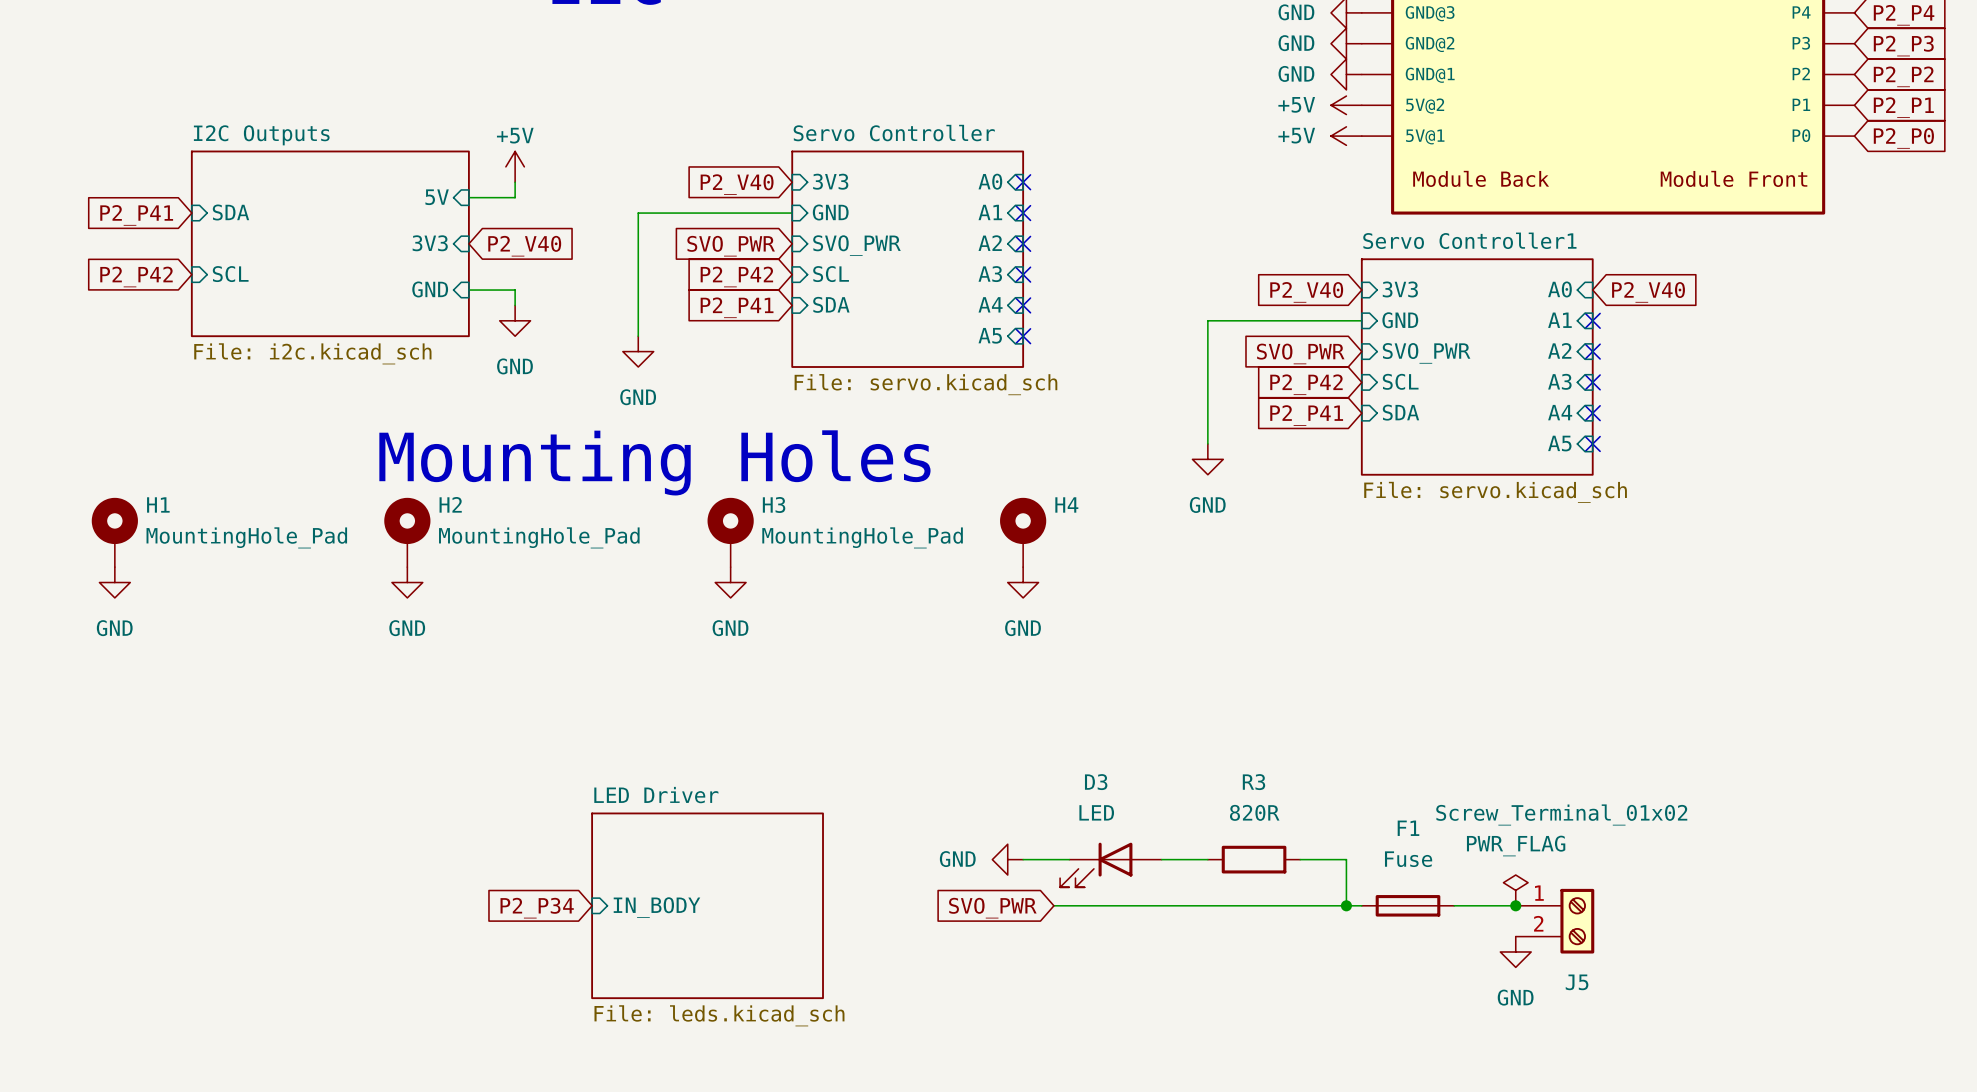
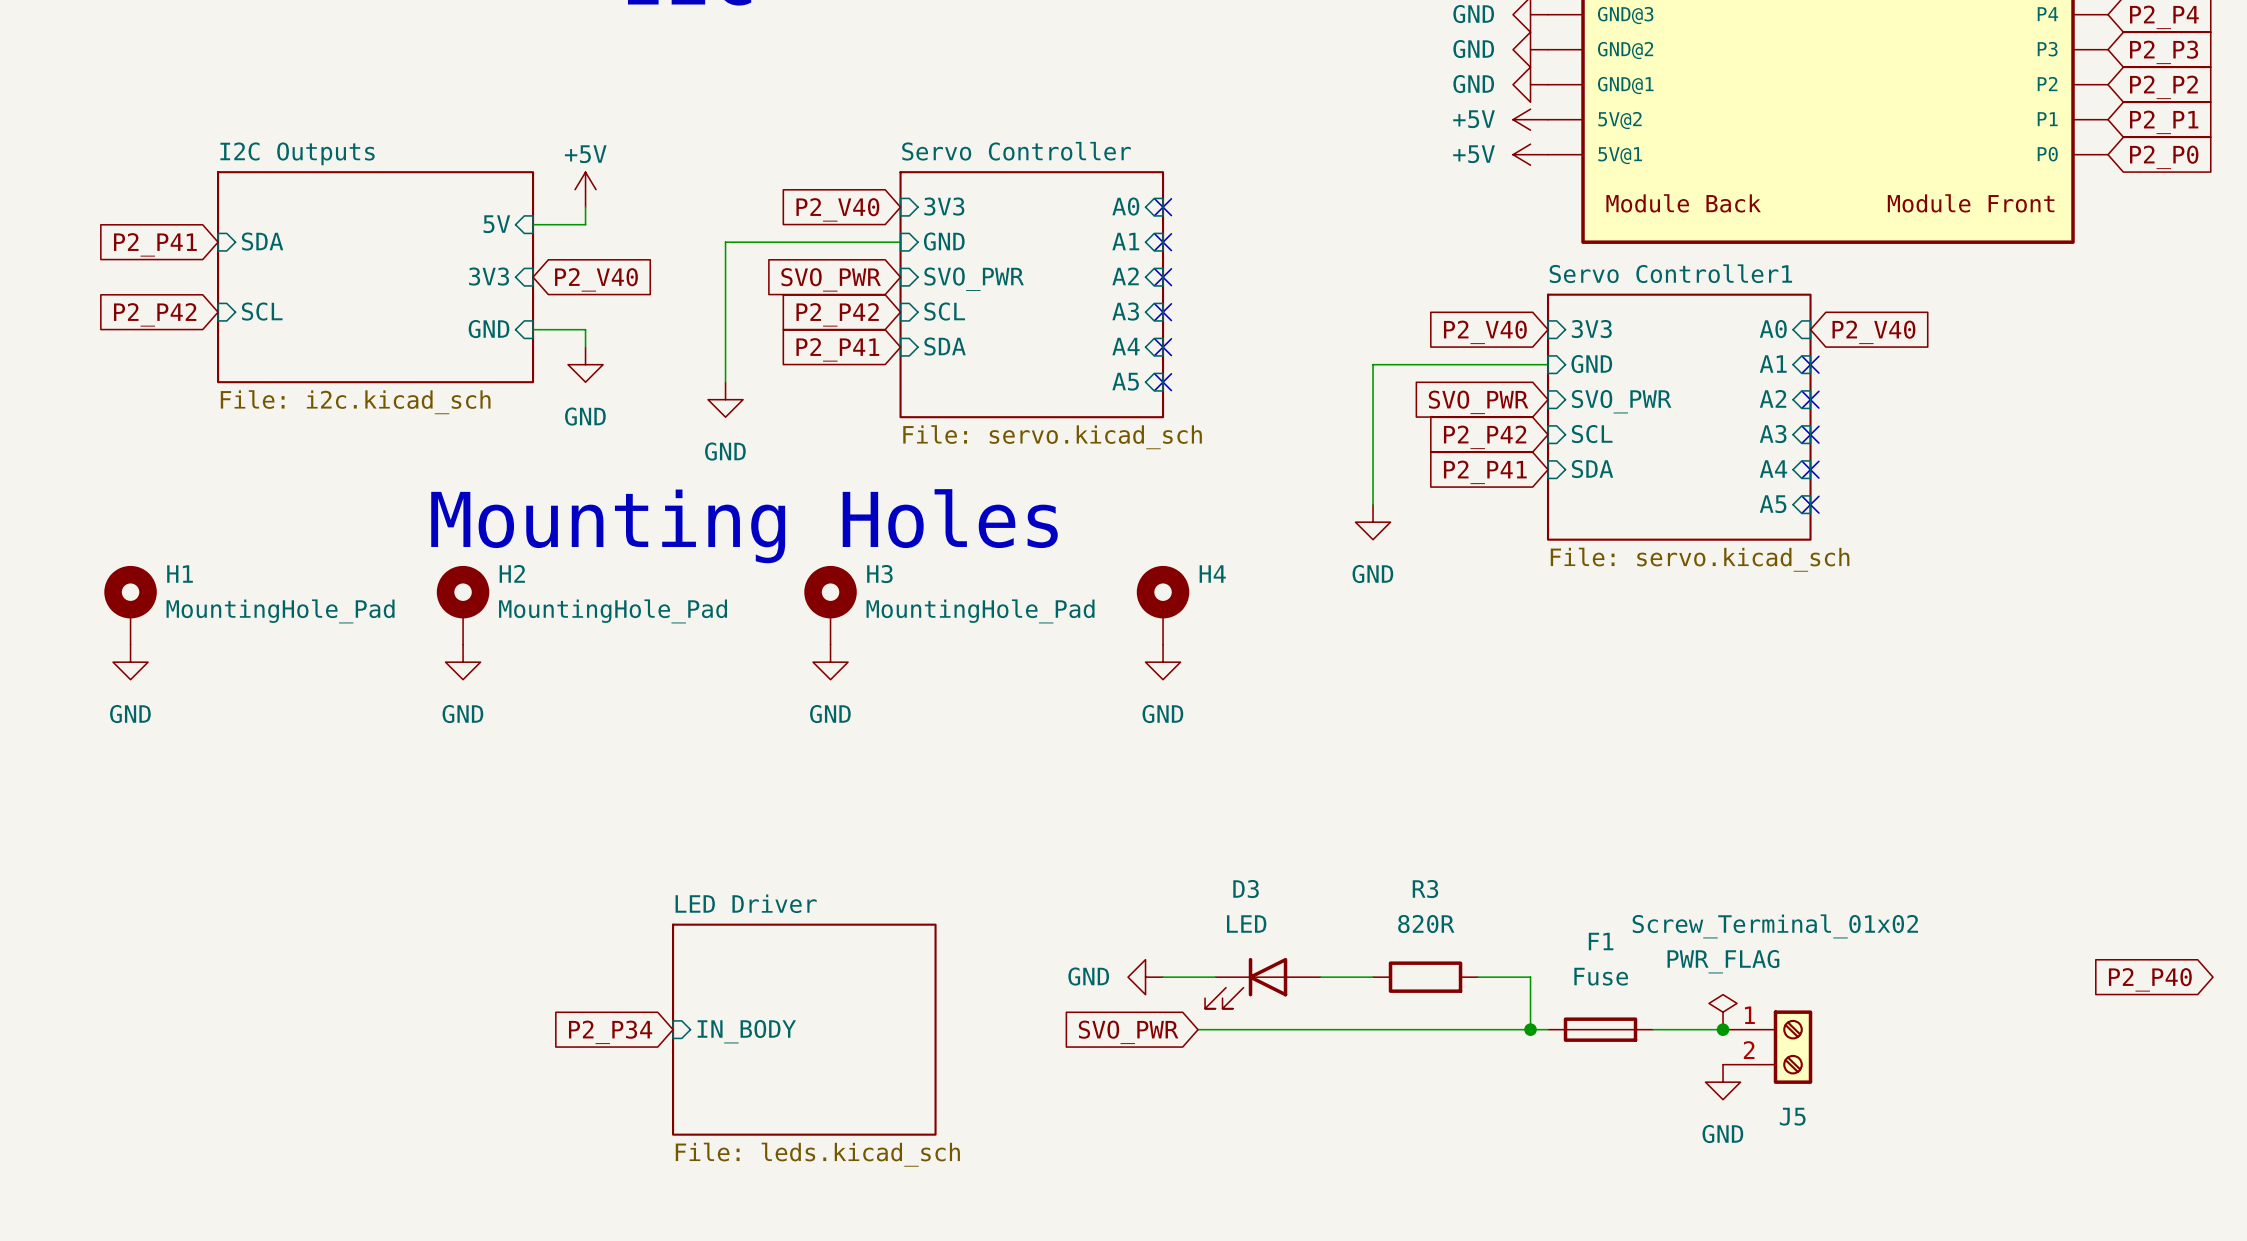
global label: none -> P2_P40 (2150, 979)

